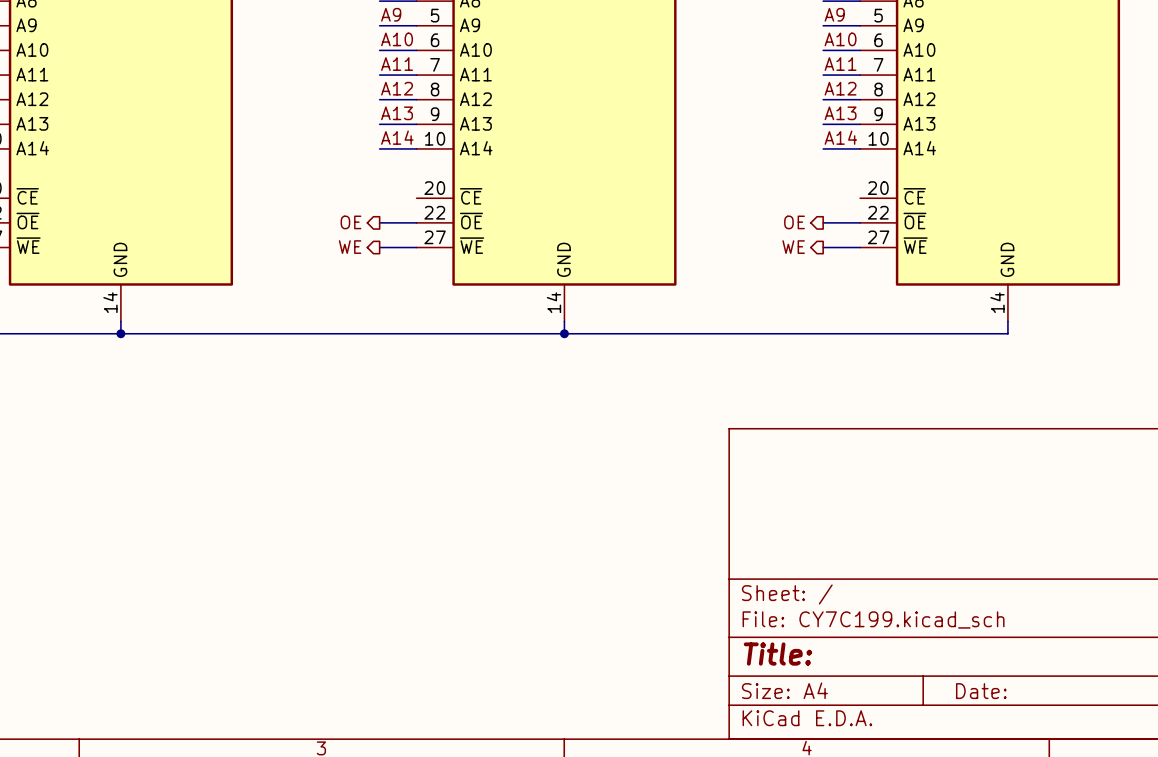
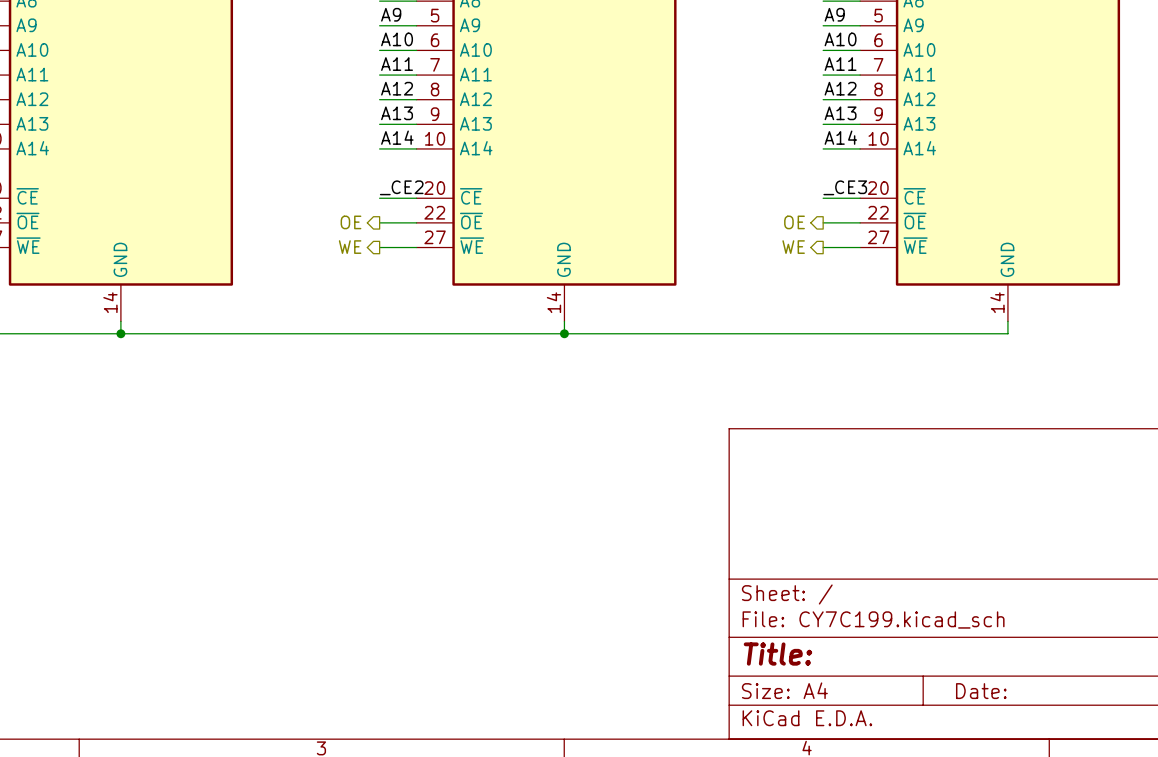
label: none -> _CE2 (401, 187)
label: none -> _CE3 (845, 187)
wire: none -> (379, 198) (416, 198)
wire: none -> (823, 198) (860, 198)

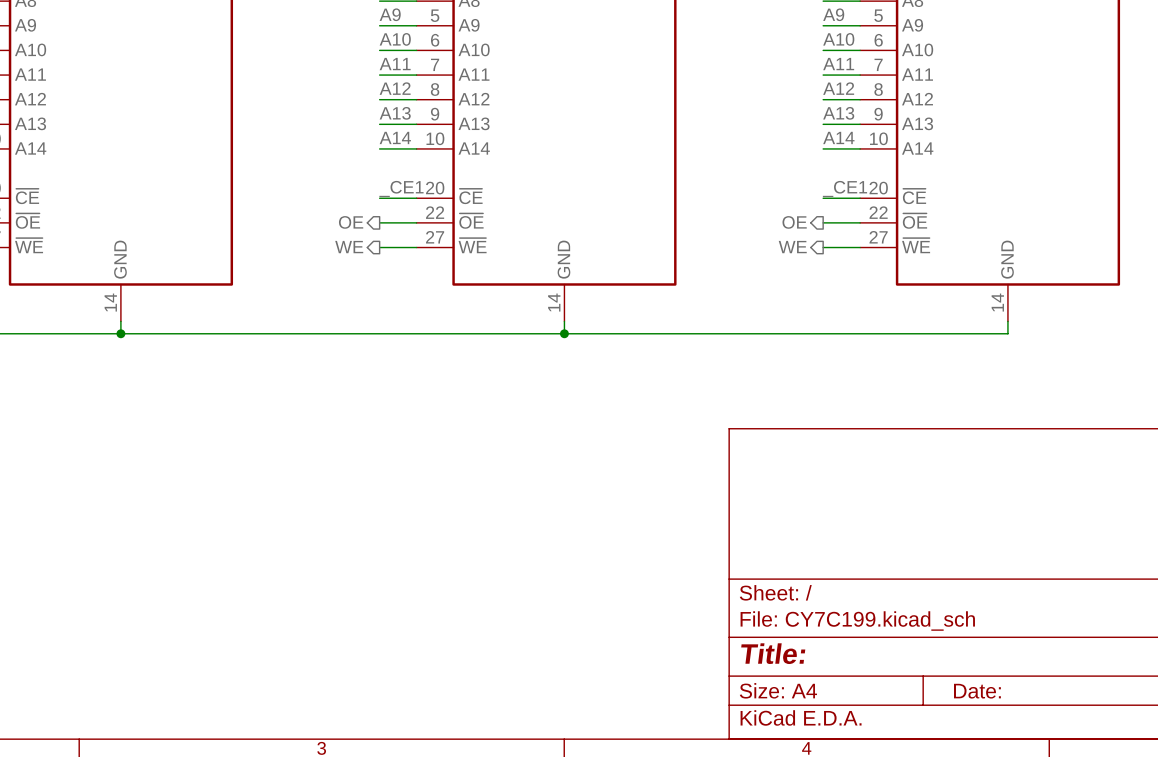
label: _CE2 (401, 187) -> _CE1 (401, 188)
label: _CE3 (845, 187) -> _CE1 (844, 188)

